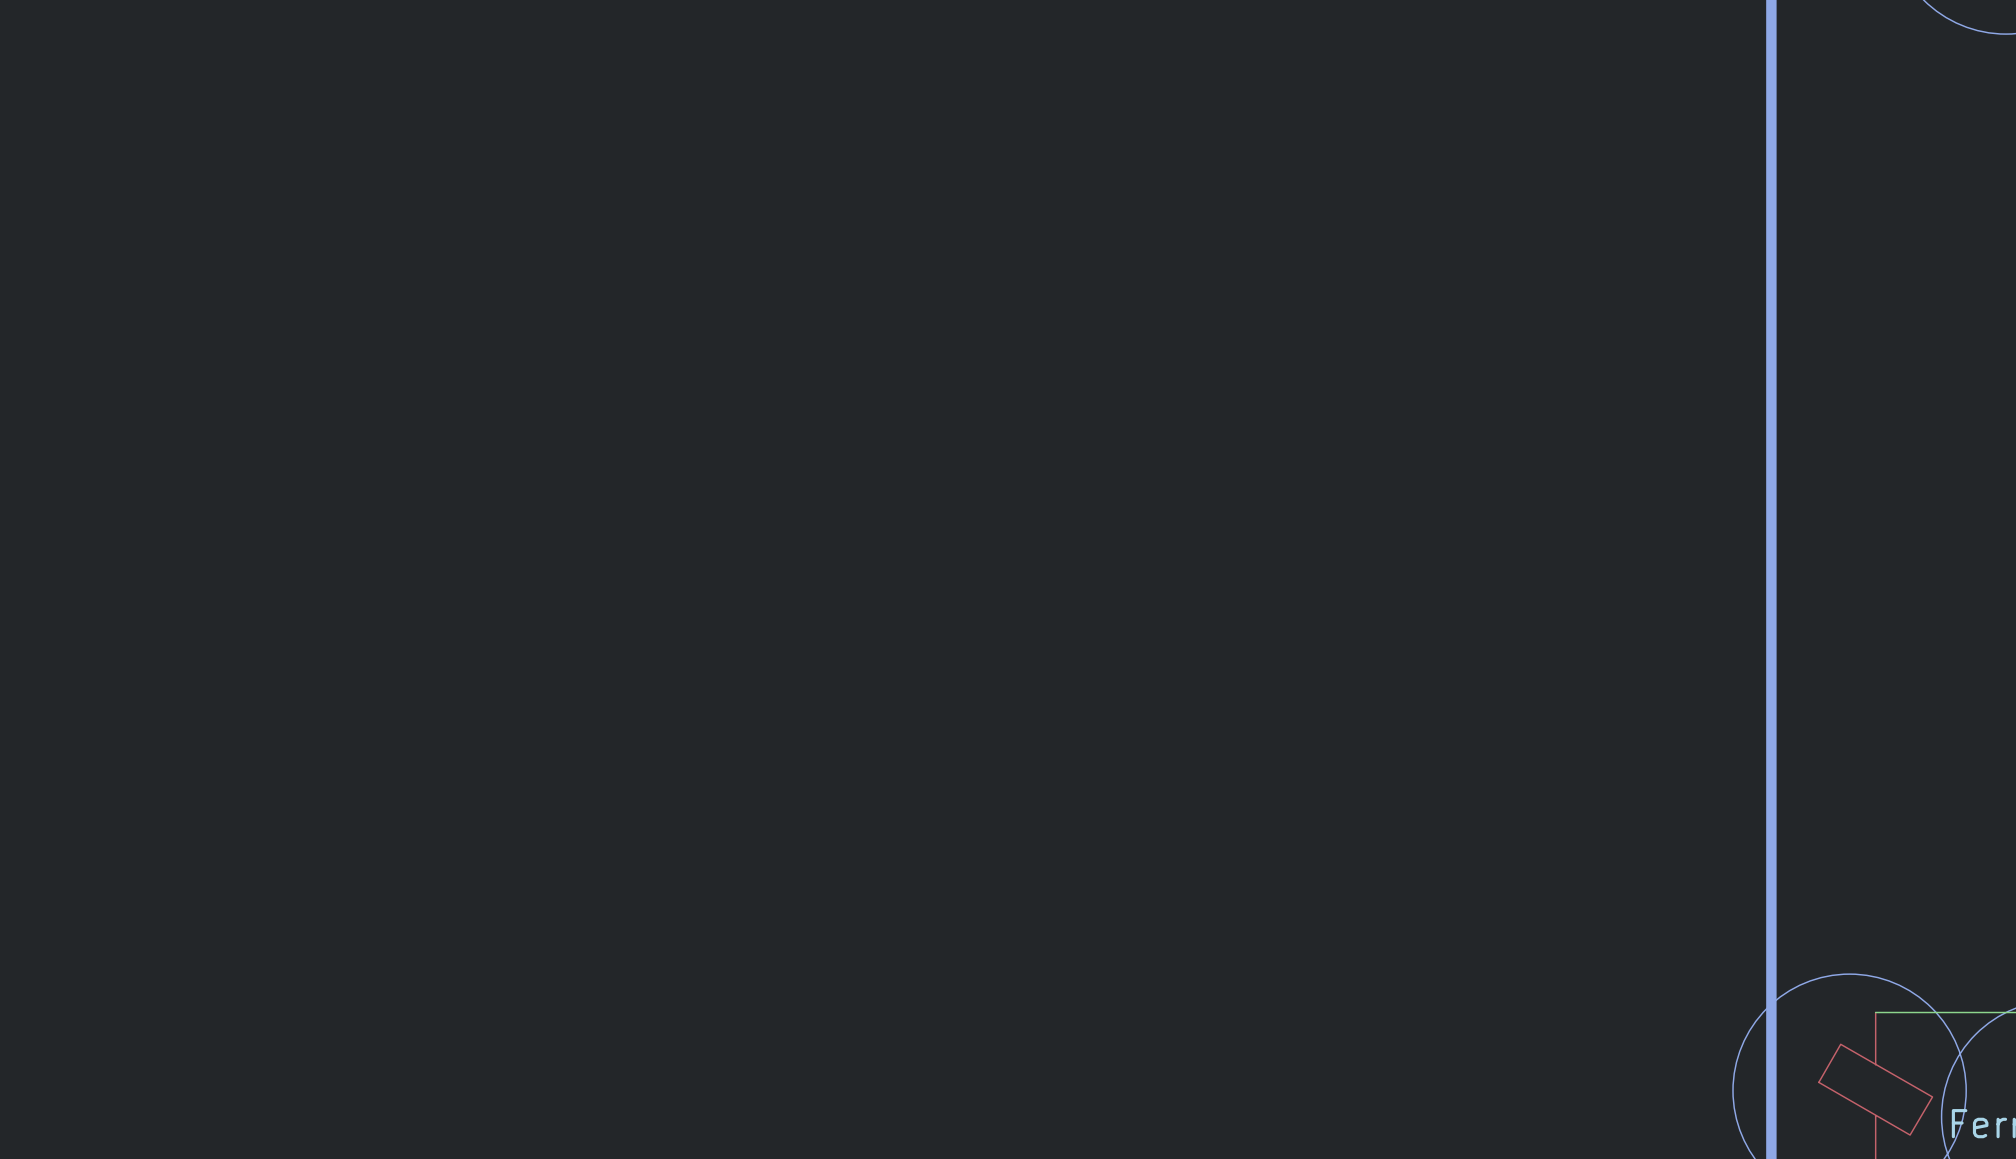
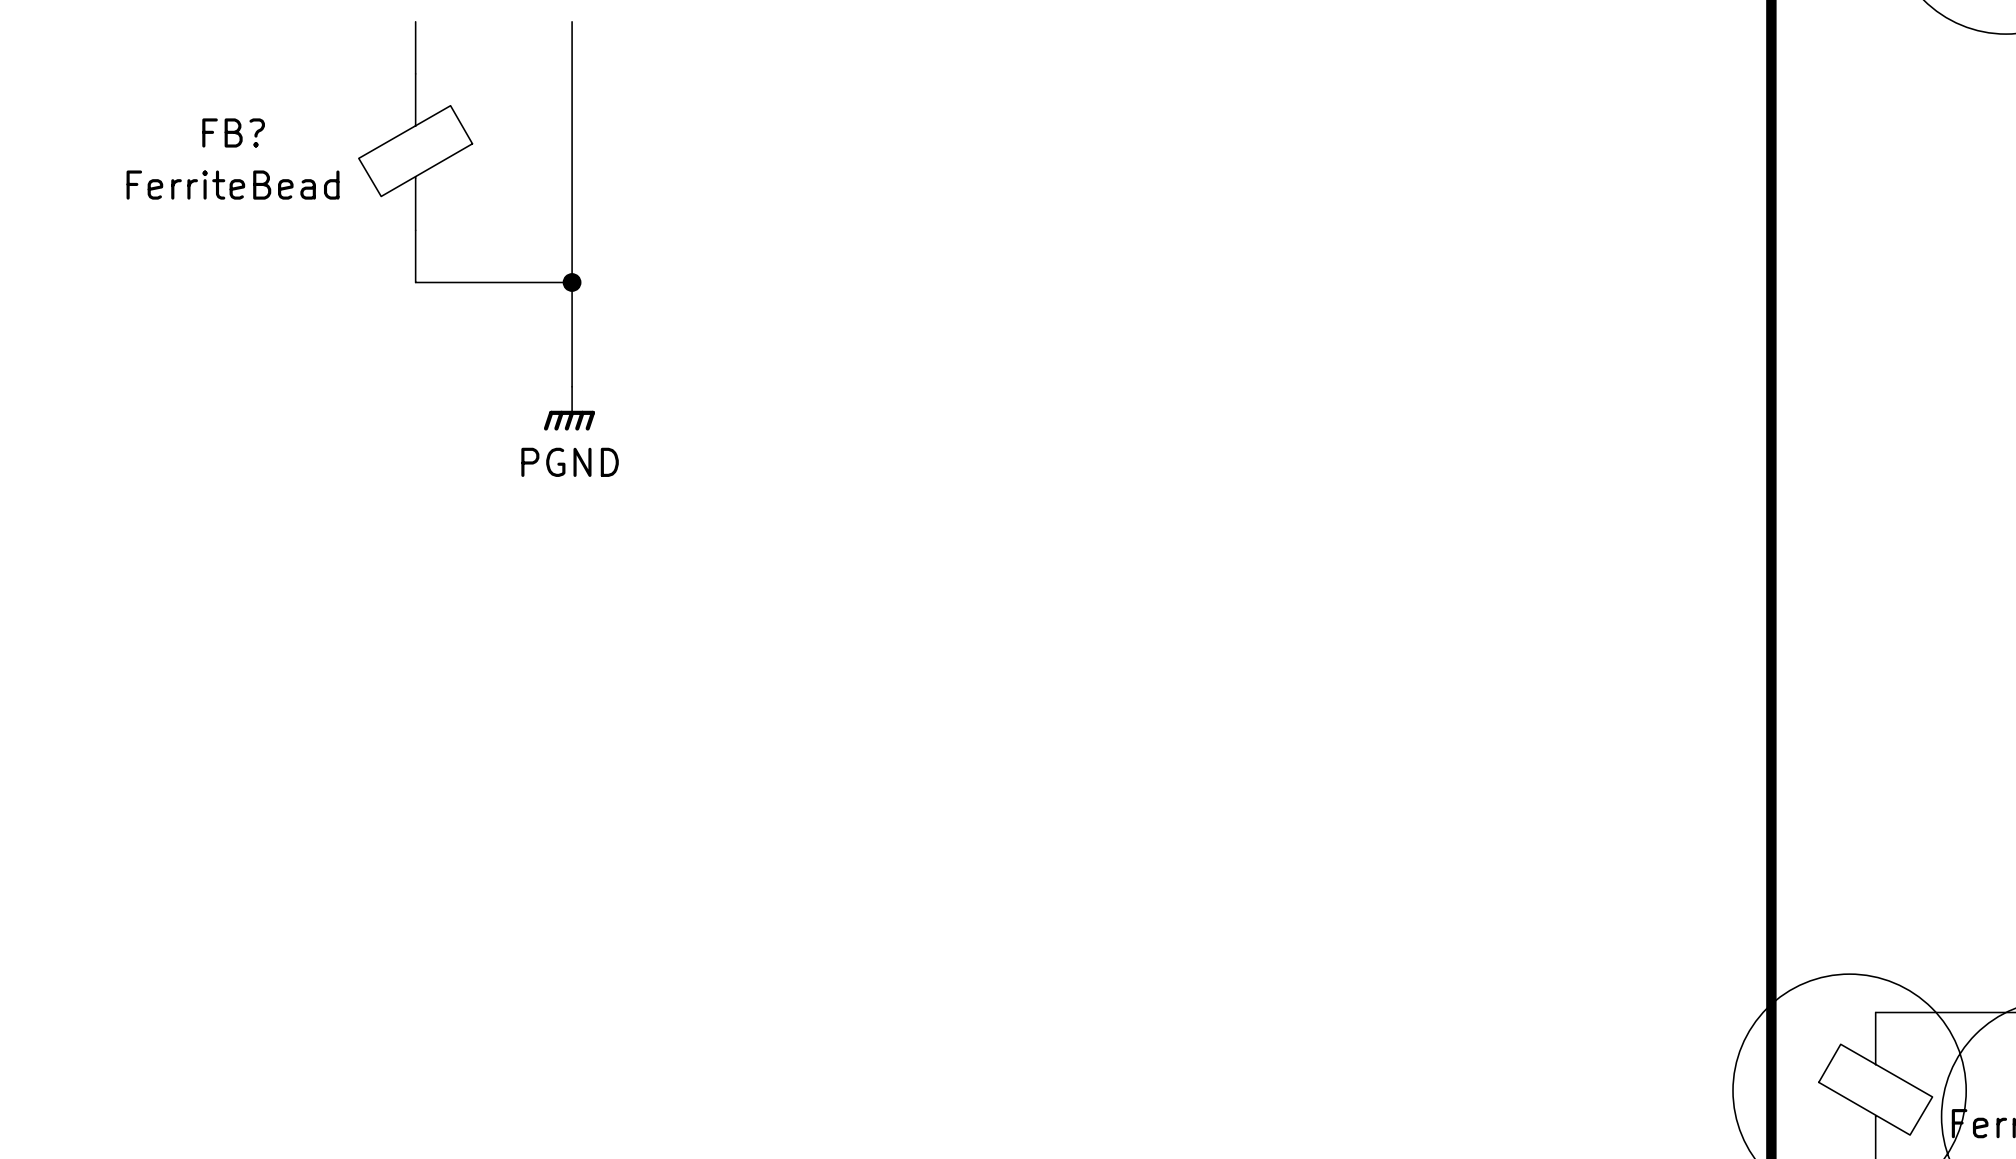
wire: none -> (415, 21) (415, 73)
wire: none -> (572, 21) (572, 386)
FB?: none -> FerriteBead (415, 152)
wire: none -> (415, 230) (415, 282) (572, 282)
junction: none -> (572, 282)
power symbol: none -> PGND (569, 408)

